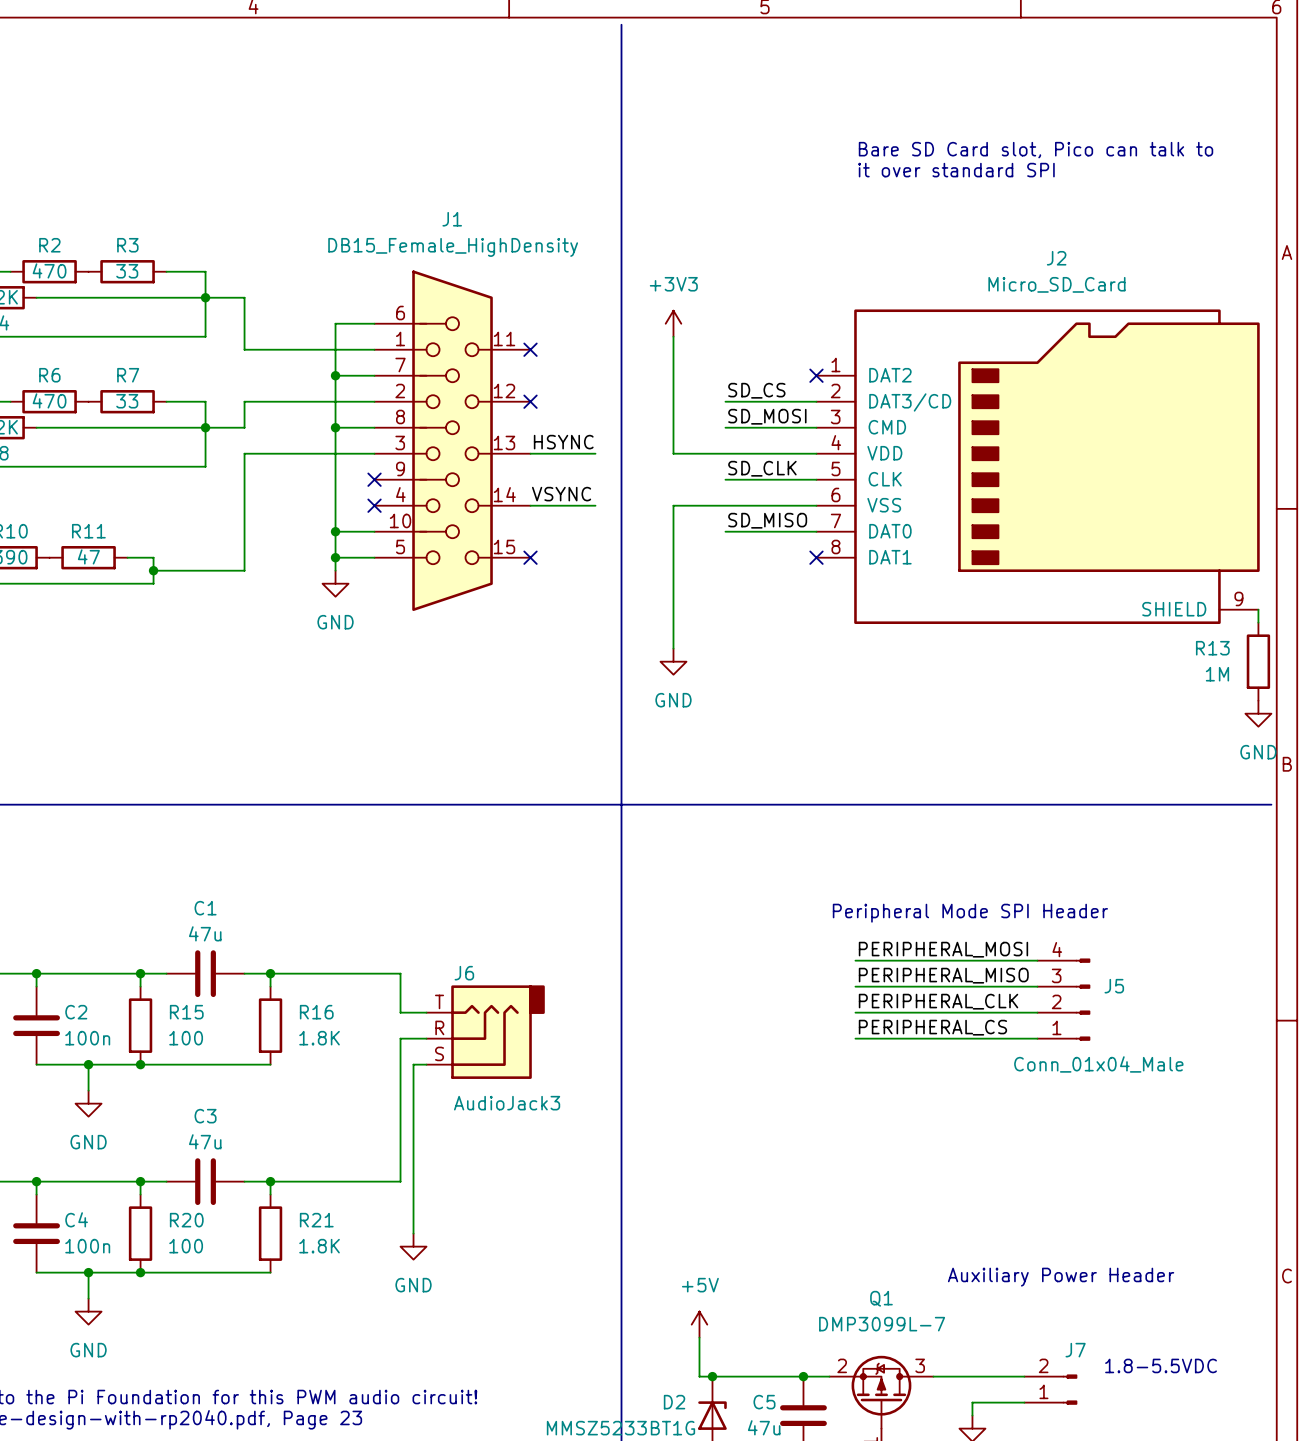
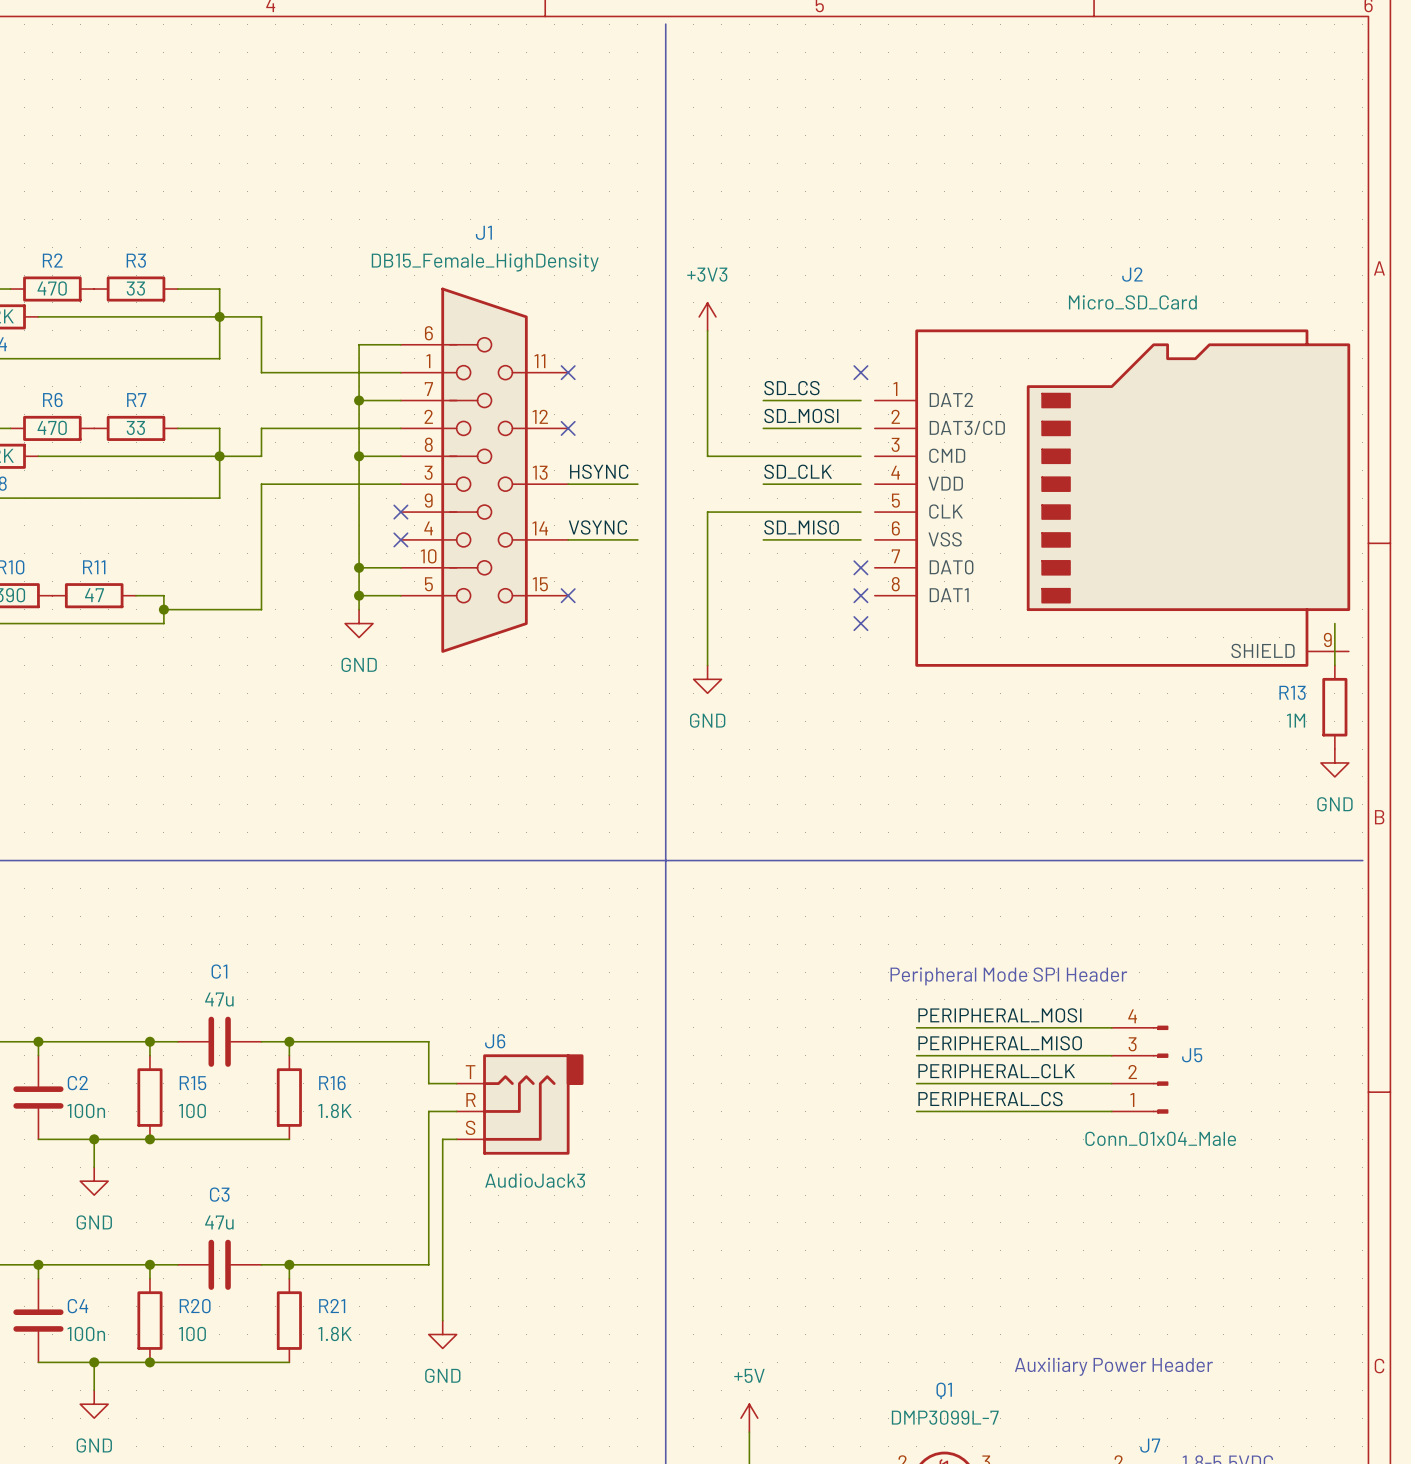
text: Bare SD Card slot, Pico can talk to (1036, 150) -> none
text: it over standard SPI (956, 170) -> none
wire: none -> (707, 330) (707, 456) (777, 456)
power symbol position: +3V3 (673, 323) -> +3V3 (707, 316)
wire: (673, 336) (673, 453) (712, 453) -> none
no-connect mark position: (816, 375) -> (860, 372)
label position: SD_CS (756, 390) -> SD_CS (791, 388)
wire: (803, 401) (816, 401) -> (763, 428) (777, 428)
label position: SD_MOSI (767, 416) -> SD_MOSI (801, 415)
wire: (803, 427) (816, 427) -> none
wire: (803, 453) (816, 453) -> none
label position: SD_CLK (762, 468) -> SD_CLK (798, 471)
wire: none -> (777, 512) (707, 512) (707, 665)
wire: (803, 479) (816, 479) -> none
wire: (712, 505) (673, 505) (673, 648) -> none
wire: (803, 505) (816, 505) -> none
label position: SD_MISO (767, 520) -> SD_MISO (801, 527)
wire: (725, 531) (816, 531) -> (763, 400) (860, 400)
no-connect mark: none -> (860, 567)
no-connect mark position: (816, 557) -> (860, 595)
no-connect mark: none -> (860, 623)
wire: none -> (1334, 623) (1334, 665)
wire: (1258, 609) (1258, 622) -> none
power symbol position: GND (673, 661) -> GND (707, 679)
R13 position: (1258, 661) -> (1334, 707)
power symbol position: GND (1258, 713) -> GND (1334, 762)

